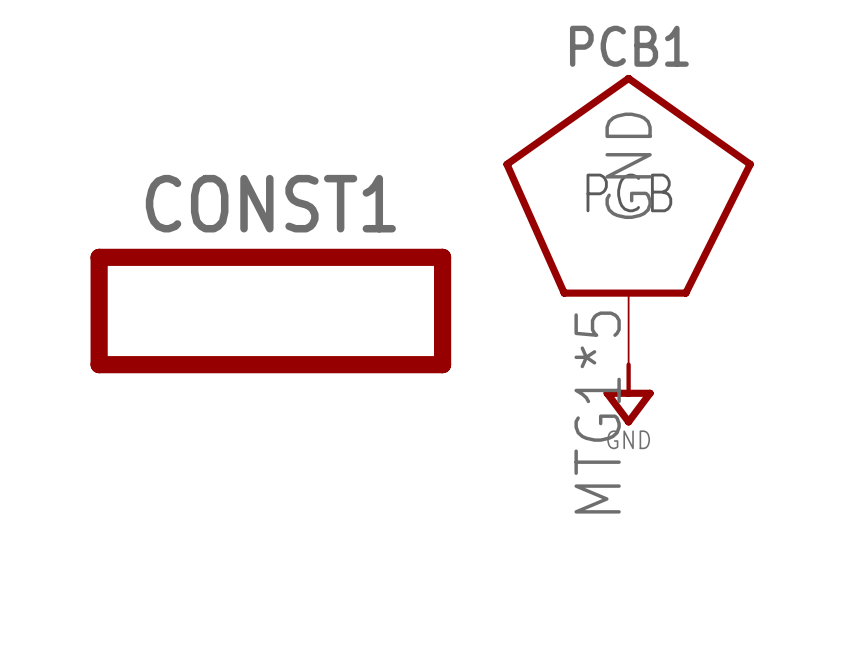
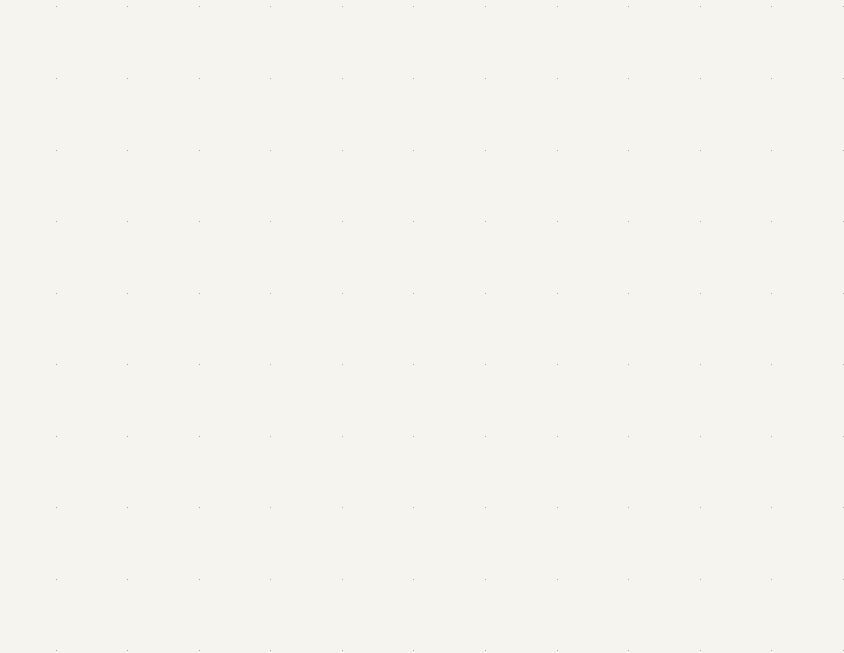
PCB1: (628, 219) -> none
CONST1: (270, 311) -> none
power symbol: GND (628, 394) -> none

